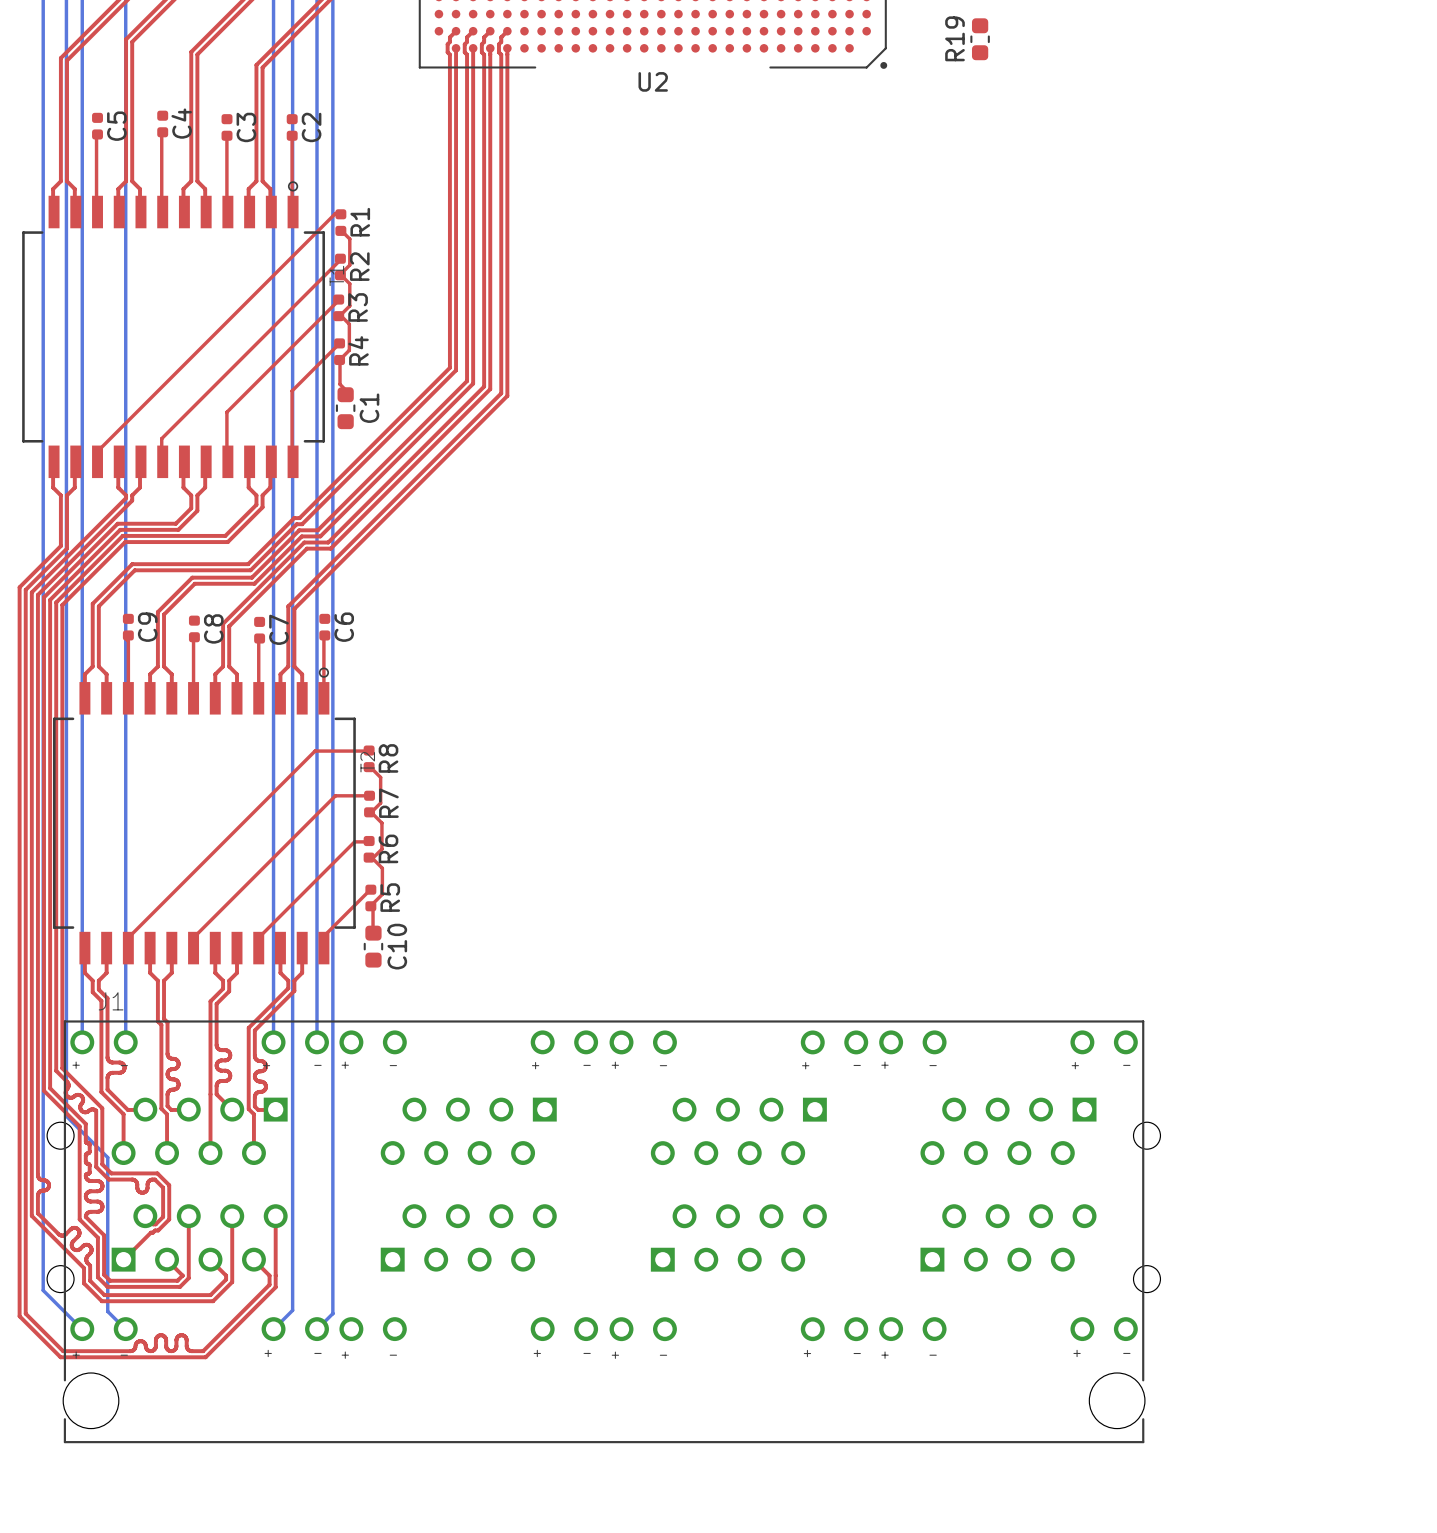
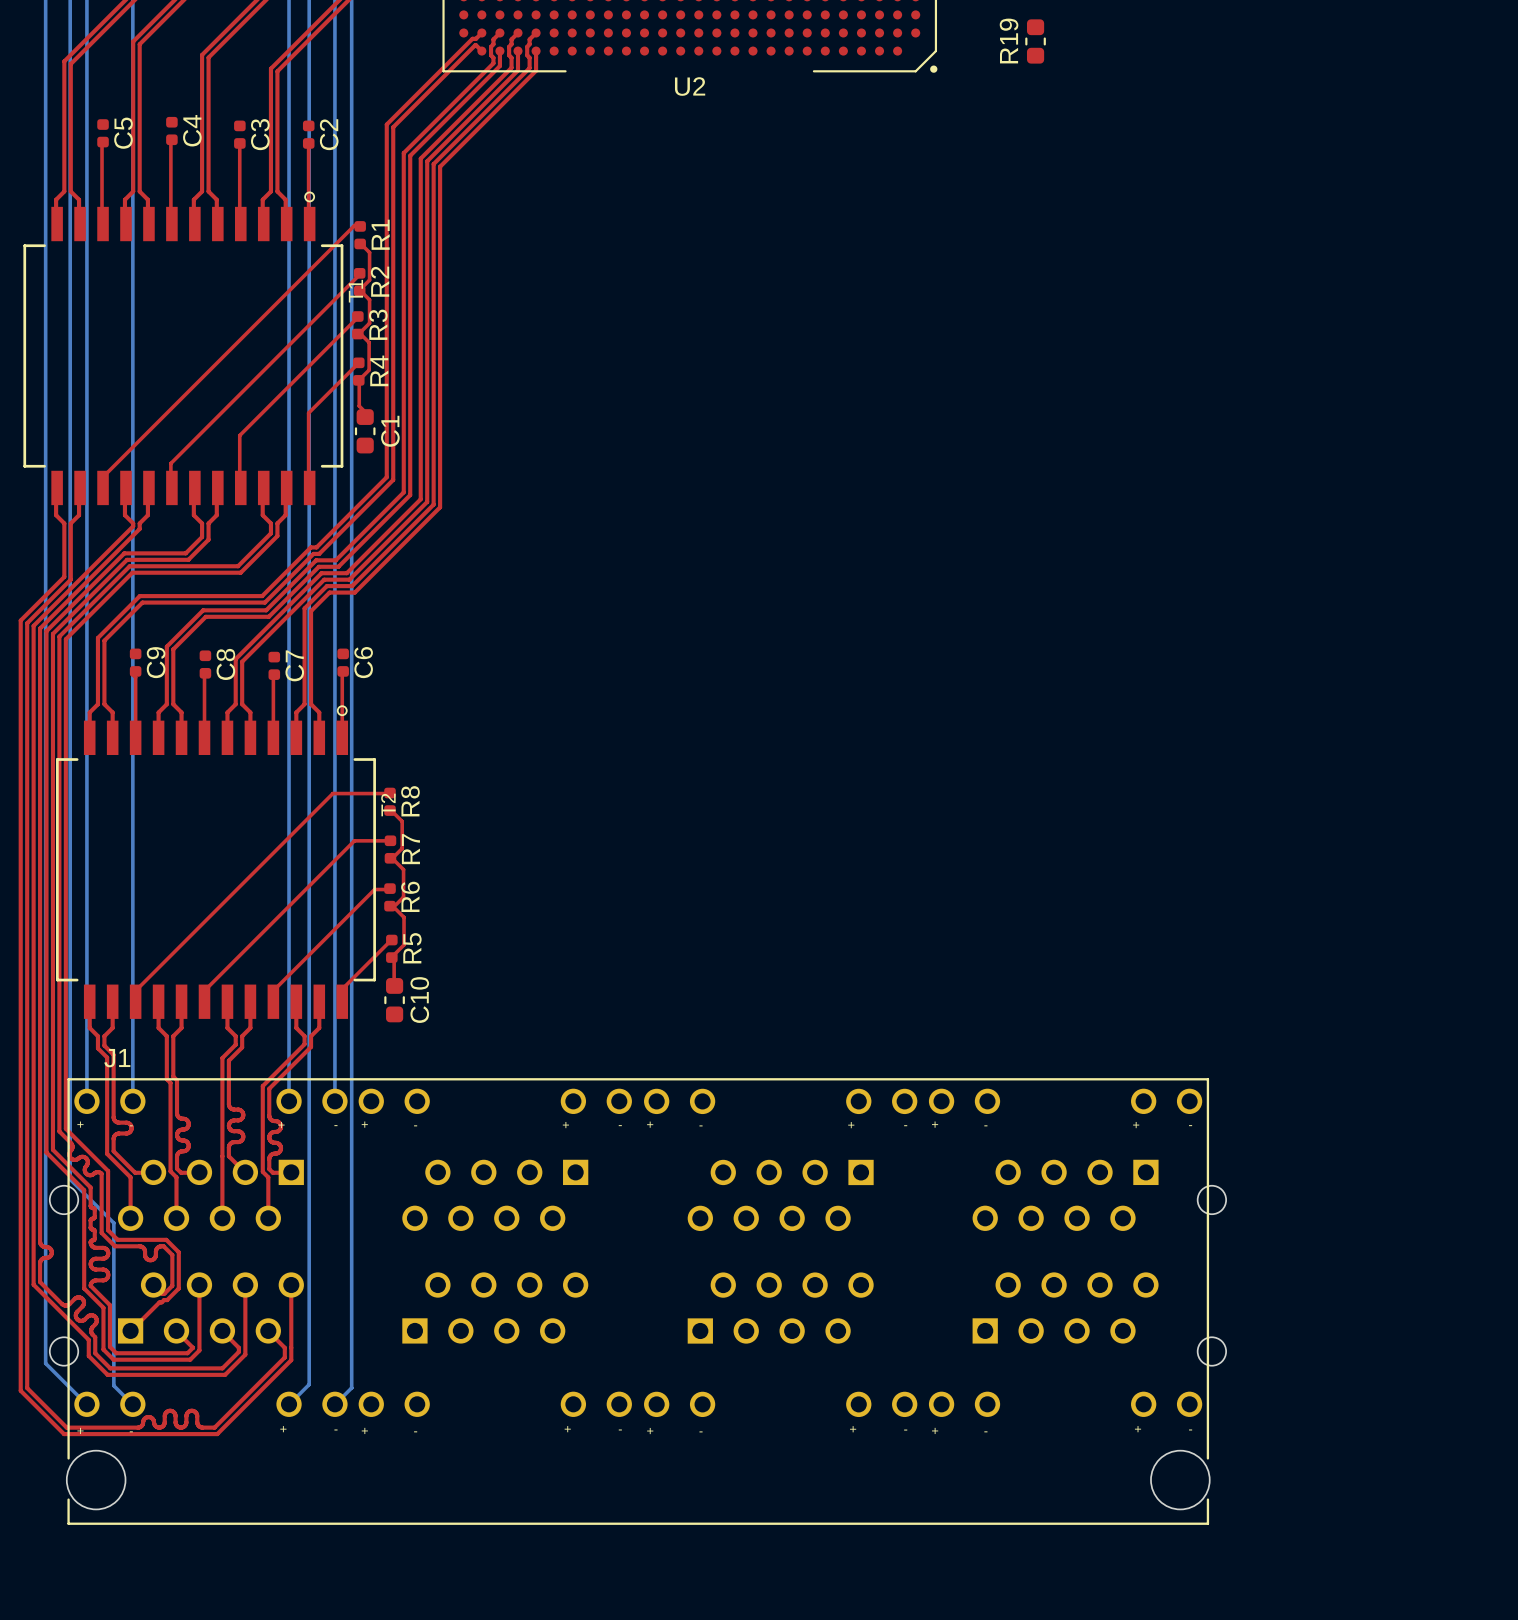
top track: (450, 36) (447, 44) (447, 52) (449, 54) (449, 367) (366, 451) -> (476, 38) (472, 38) (386, 124) (386, 477)
top track: (456, 48) (456, 370) (372, 454) -> (481, 51) (475, 45) (393, 127) (393, 479)
top track: (467, 59) (467, 381) (382, 466) -> (493, 63) (403, 153) (403, 492)
top track: (473, 62) (473, 383) (388, 468) -> (499, 66) (410, 155) (410, 495)
top track: (484, 64) (484, 386) (398, 472) -> (511, 67) (420, 158) (420, 499)
top track: (501, 64) (501, 393) (288, 606) -> (529, 68) (433, 164) (433, 504) (352, 586) (326, 586) (304, 608) (304, 640)
top track: (490, 66) (490, 389) (404, 475) -> (518, 70) (427, 161) (427, 501)
top track: (507, 66) (507, 395) (294, 608) -> (536, 70) (440, 166) (440, 507) (354, 592) (329, 592) (311, 611) (311, 643)

